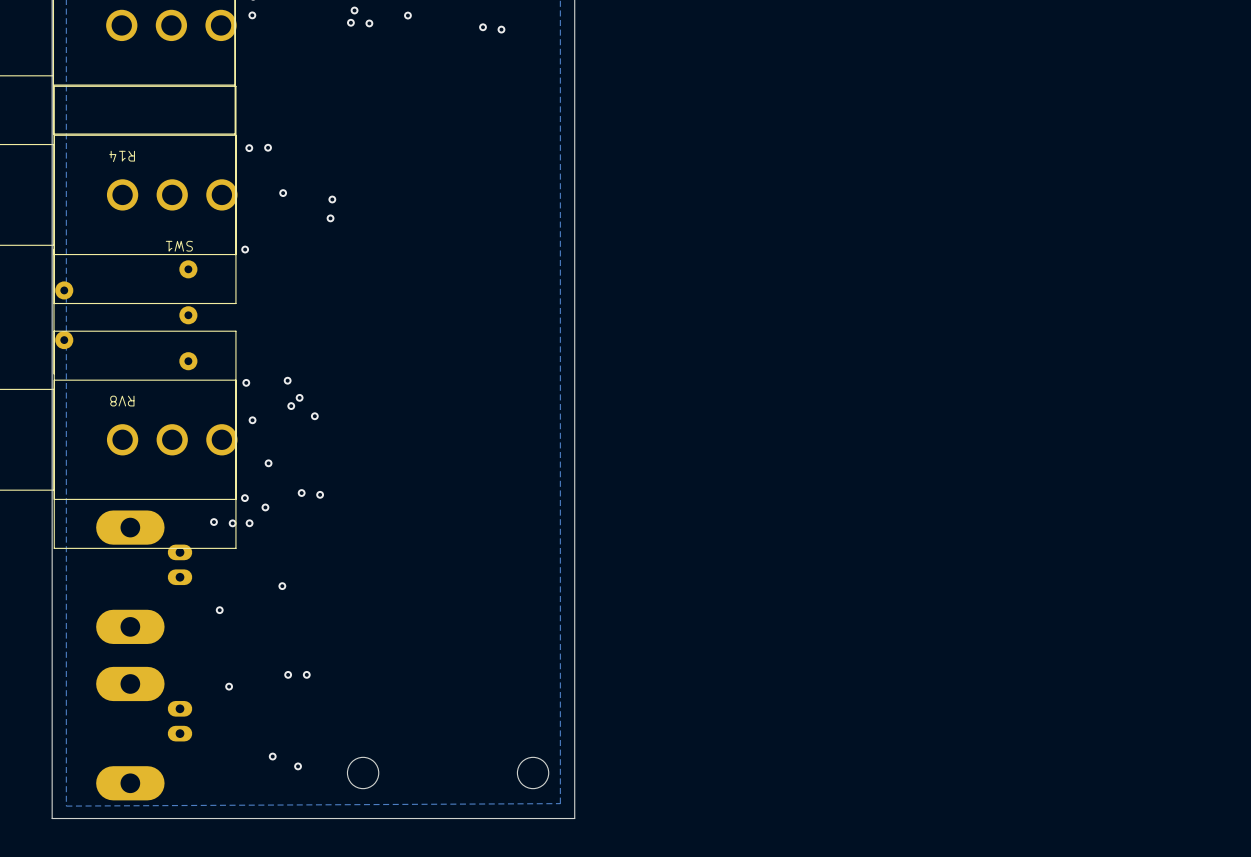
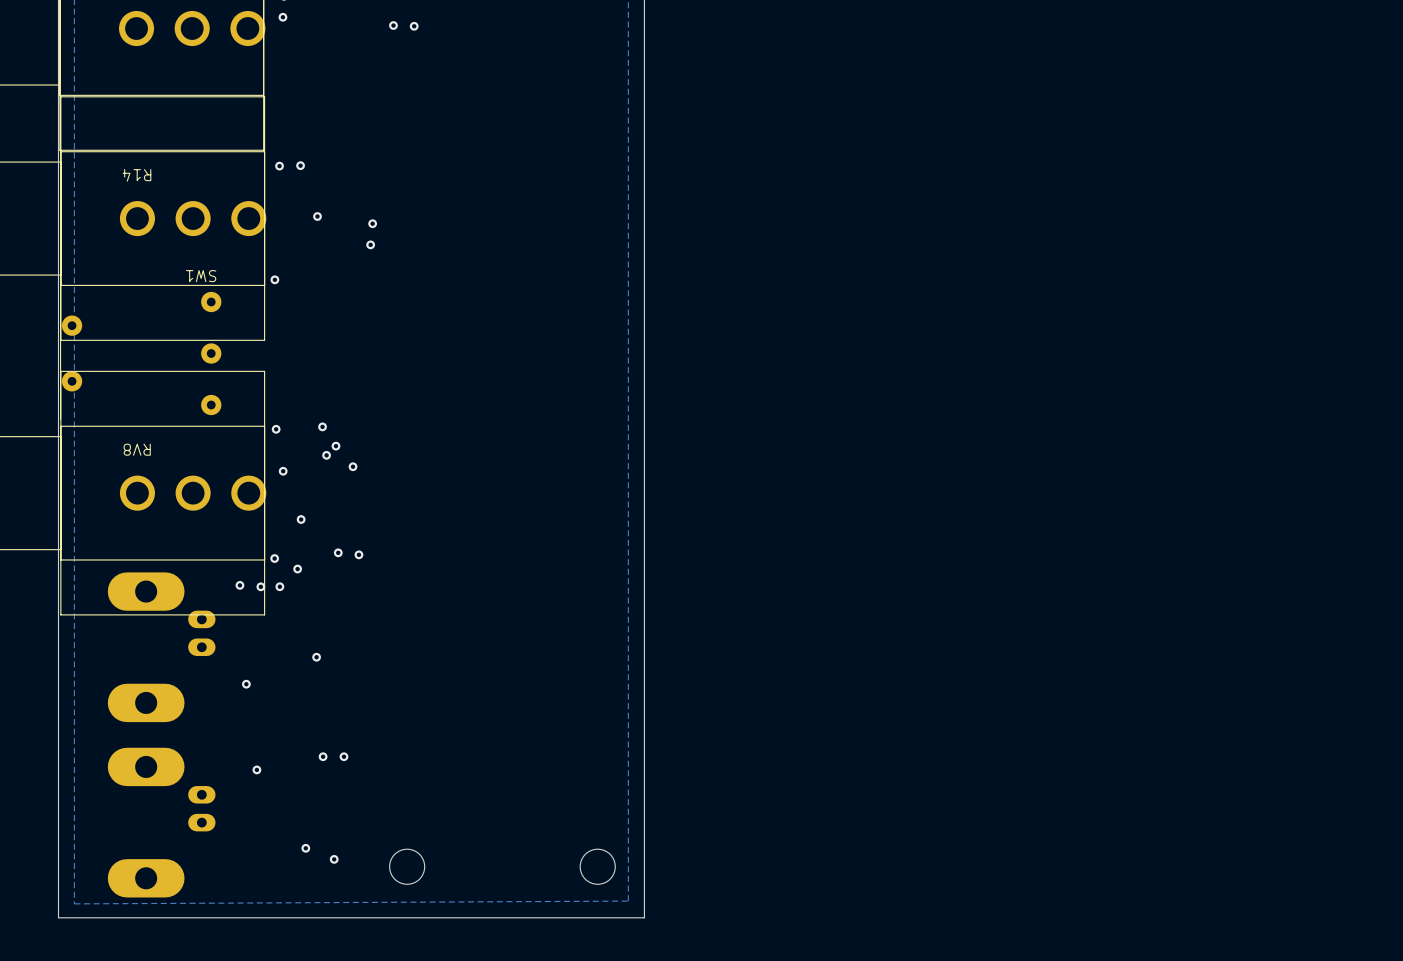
via: (354, 10) -> none
via: (407, 15) -> none
via: (483, 27) -> none
via: (501, 29) -> none

